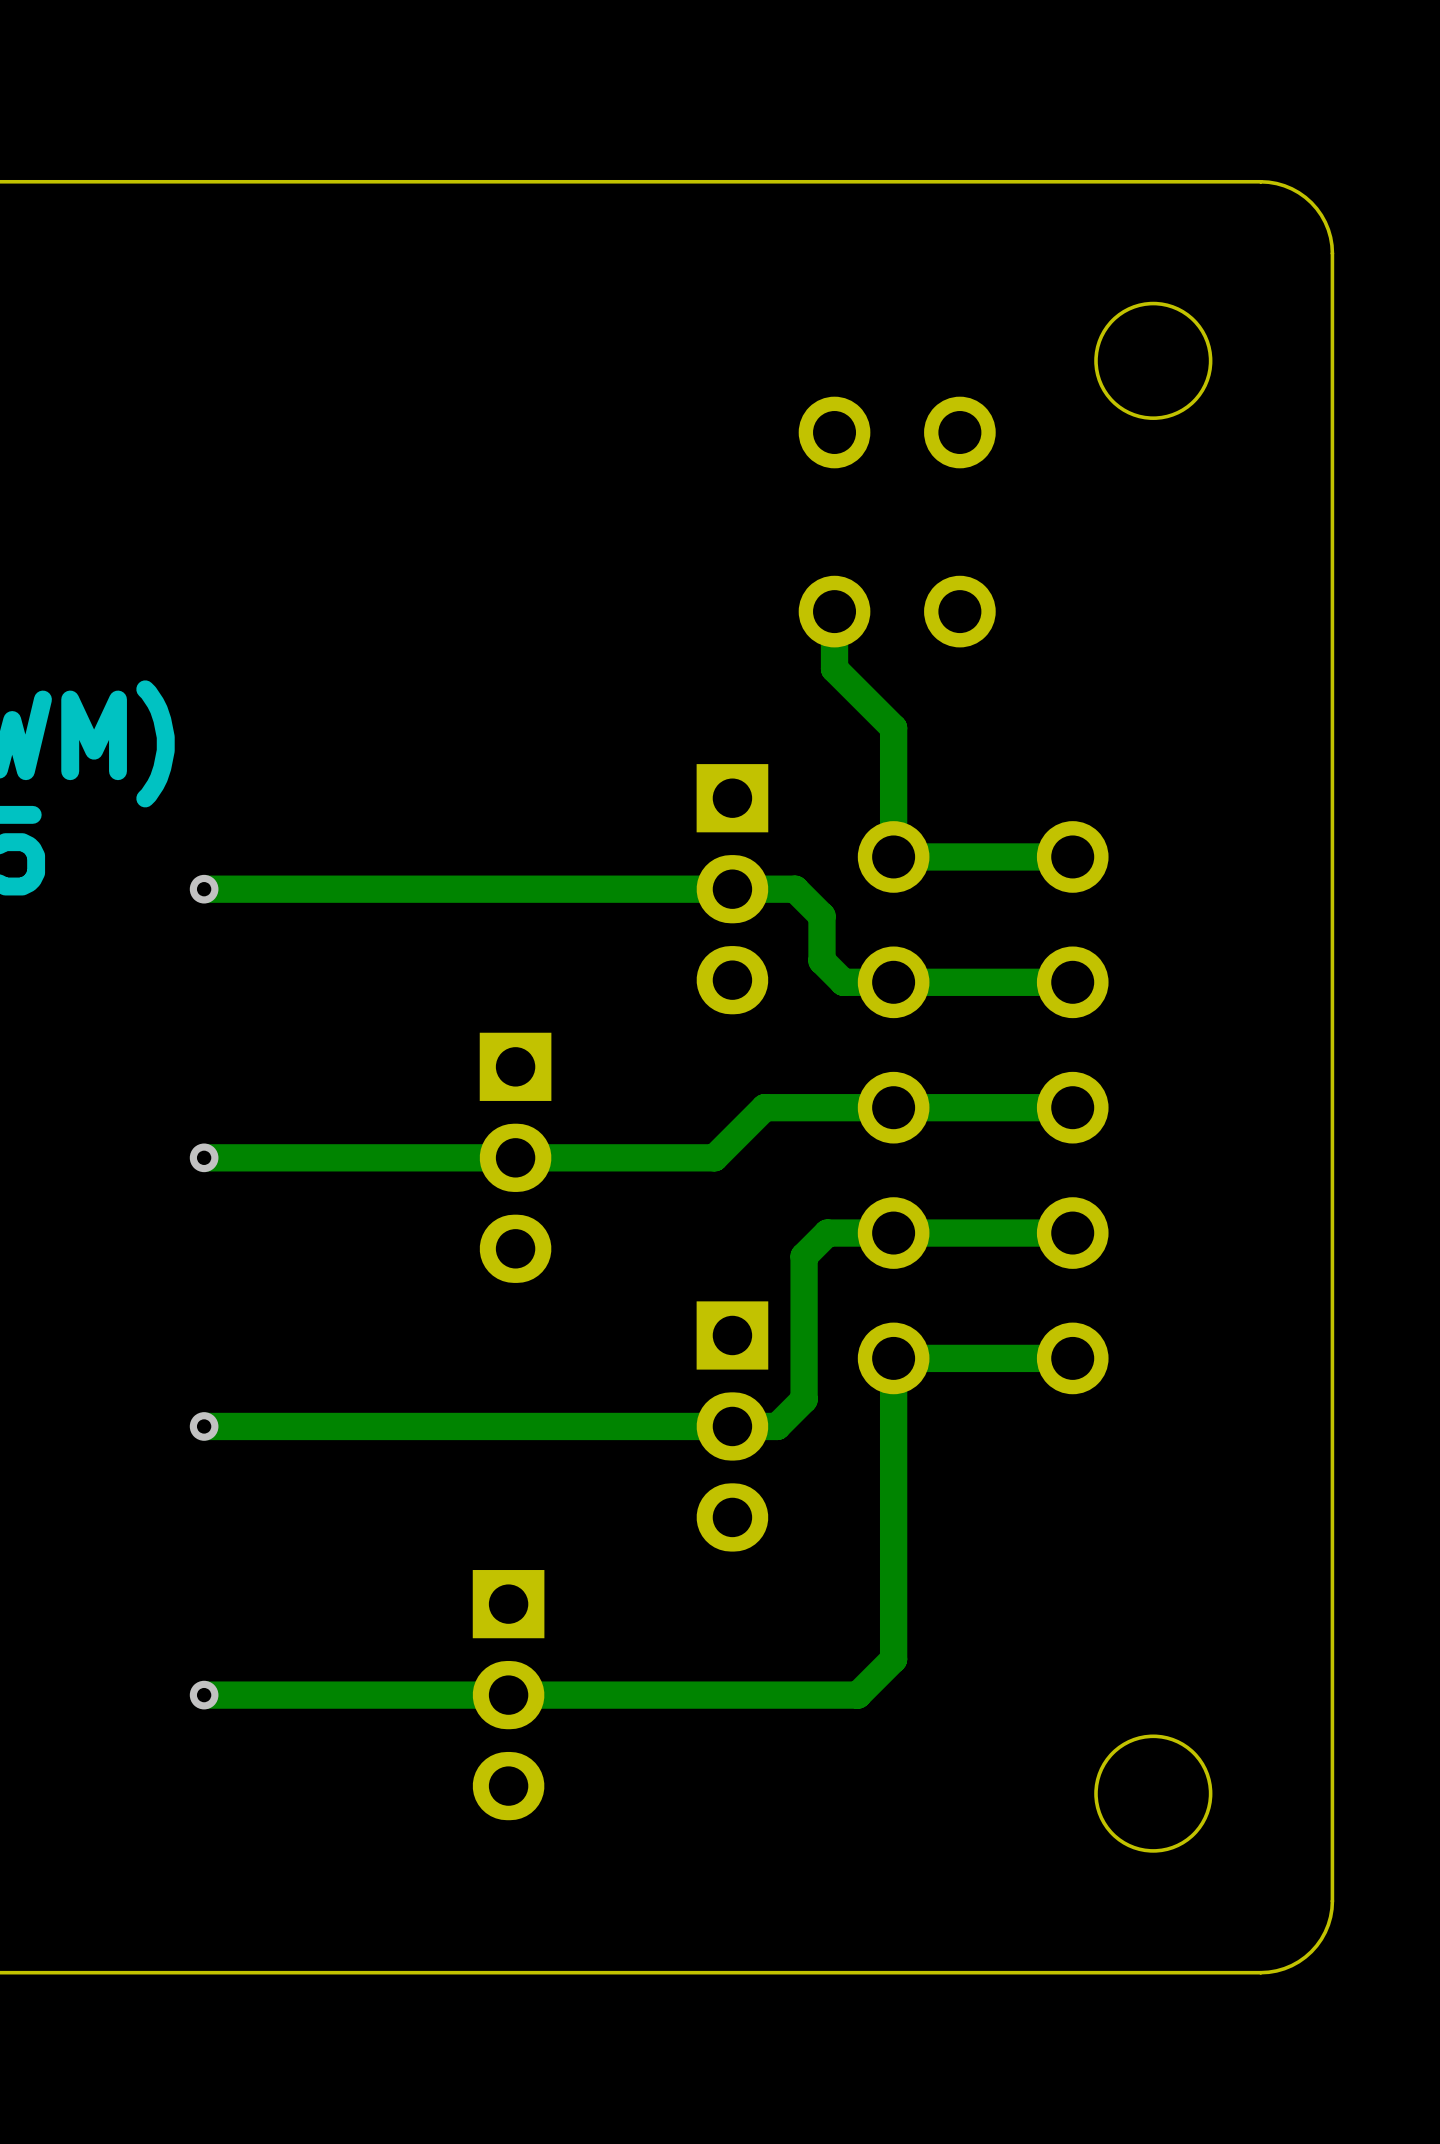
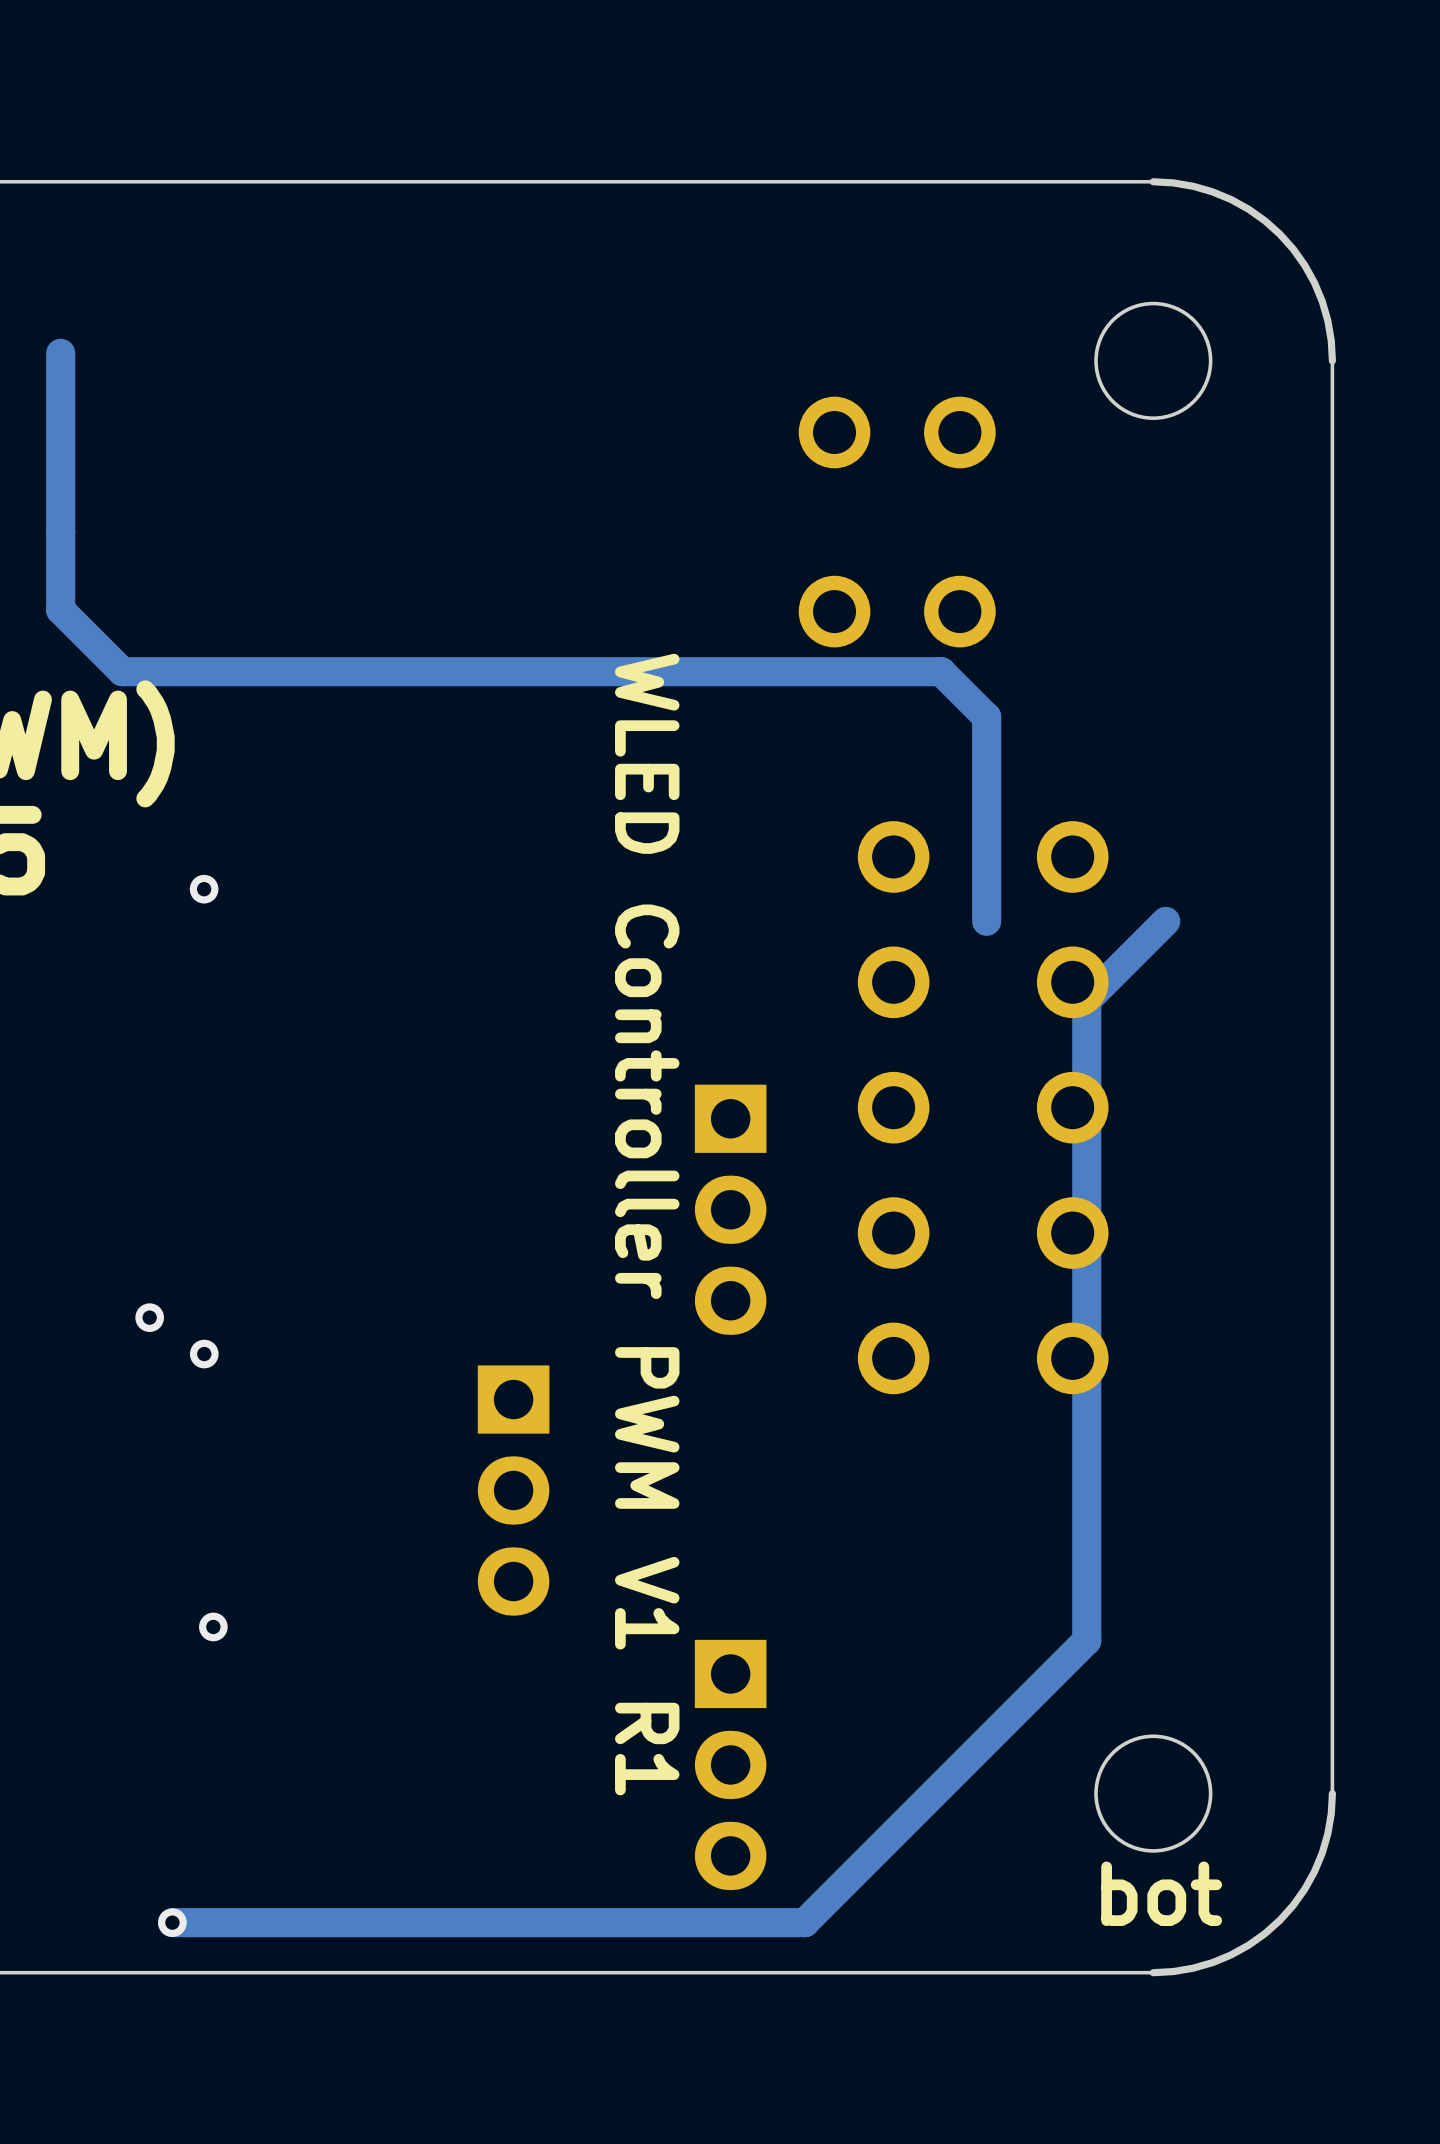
board edge: (1153, 181) (1268, 182) (1291, 188) (1311, 202) (1325, 222) (1331, 245) (1332, 360) -> (1153, 181) (1193, 186) (1231, 199) (1248, 209) (1279, 234) (1293, 249) (1314, 283) (1327, 321) (1332, 360)
track: none -> (60, 353) (60, 610) (122, 671) (941, 671) (986, 717) (986, 921)
track: (834, 611) (834, 668) (893, 728) (893, 856) (1072, 856) -> none
track: (204, 889) (795, 889) (821, 916) (821, 960) (843, 982) (1072, 982) -> none
part: (732, 889) -> none
track: none -> (1165, 921) (1086, 999) (1086, 1640) (804, 1922) (172, 1922)
track: (1072, 1107) (764, 1107) (714, 1157) (204, 1157) -> none
via: (204, 1157) -> none
part: (515, 1157) -> none
part: none -> (730, 1209)
text: none -> WLED Controller PWM V1 R1 (647, 1224)
track: (1072, 1233) (827, 1233) (804, 1256) (804, 1399) (777, 1426) (204, 1426) -> none
via: none -> (149, 1317)
via: none -> (204, 1354)
track: (1072, 1358) (893, 1358) (893, 1659) (857, 1695) (204, 1695) -> none
via: (204, 1426) -> none
part: (732, 1426) -> none
part: none -> (513, 1490)
via position: (204, 1695) -> (213, 1626)
part: (508, 1695) -> none
part: none -> (730, 1764)
board edge: (1332, 1793) (1331, 1909) (1325, 1932) (1311, 1951) (1291, 1965) (1268, 1972) (1153, 1972) -> (1332, 1793) (1327, 1833) (1314, 1871) (1293, 1905) (1279, 1920) (1248, 1945) (1212, 1962) (1193, 1968) (1153, 1972)
text: none -> bot (1161, 1893)
via: none -> (172, 1922)

